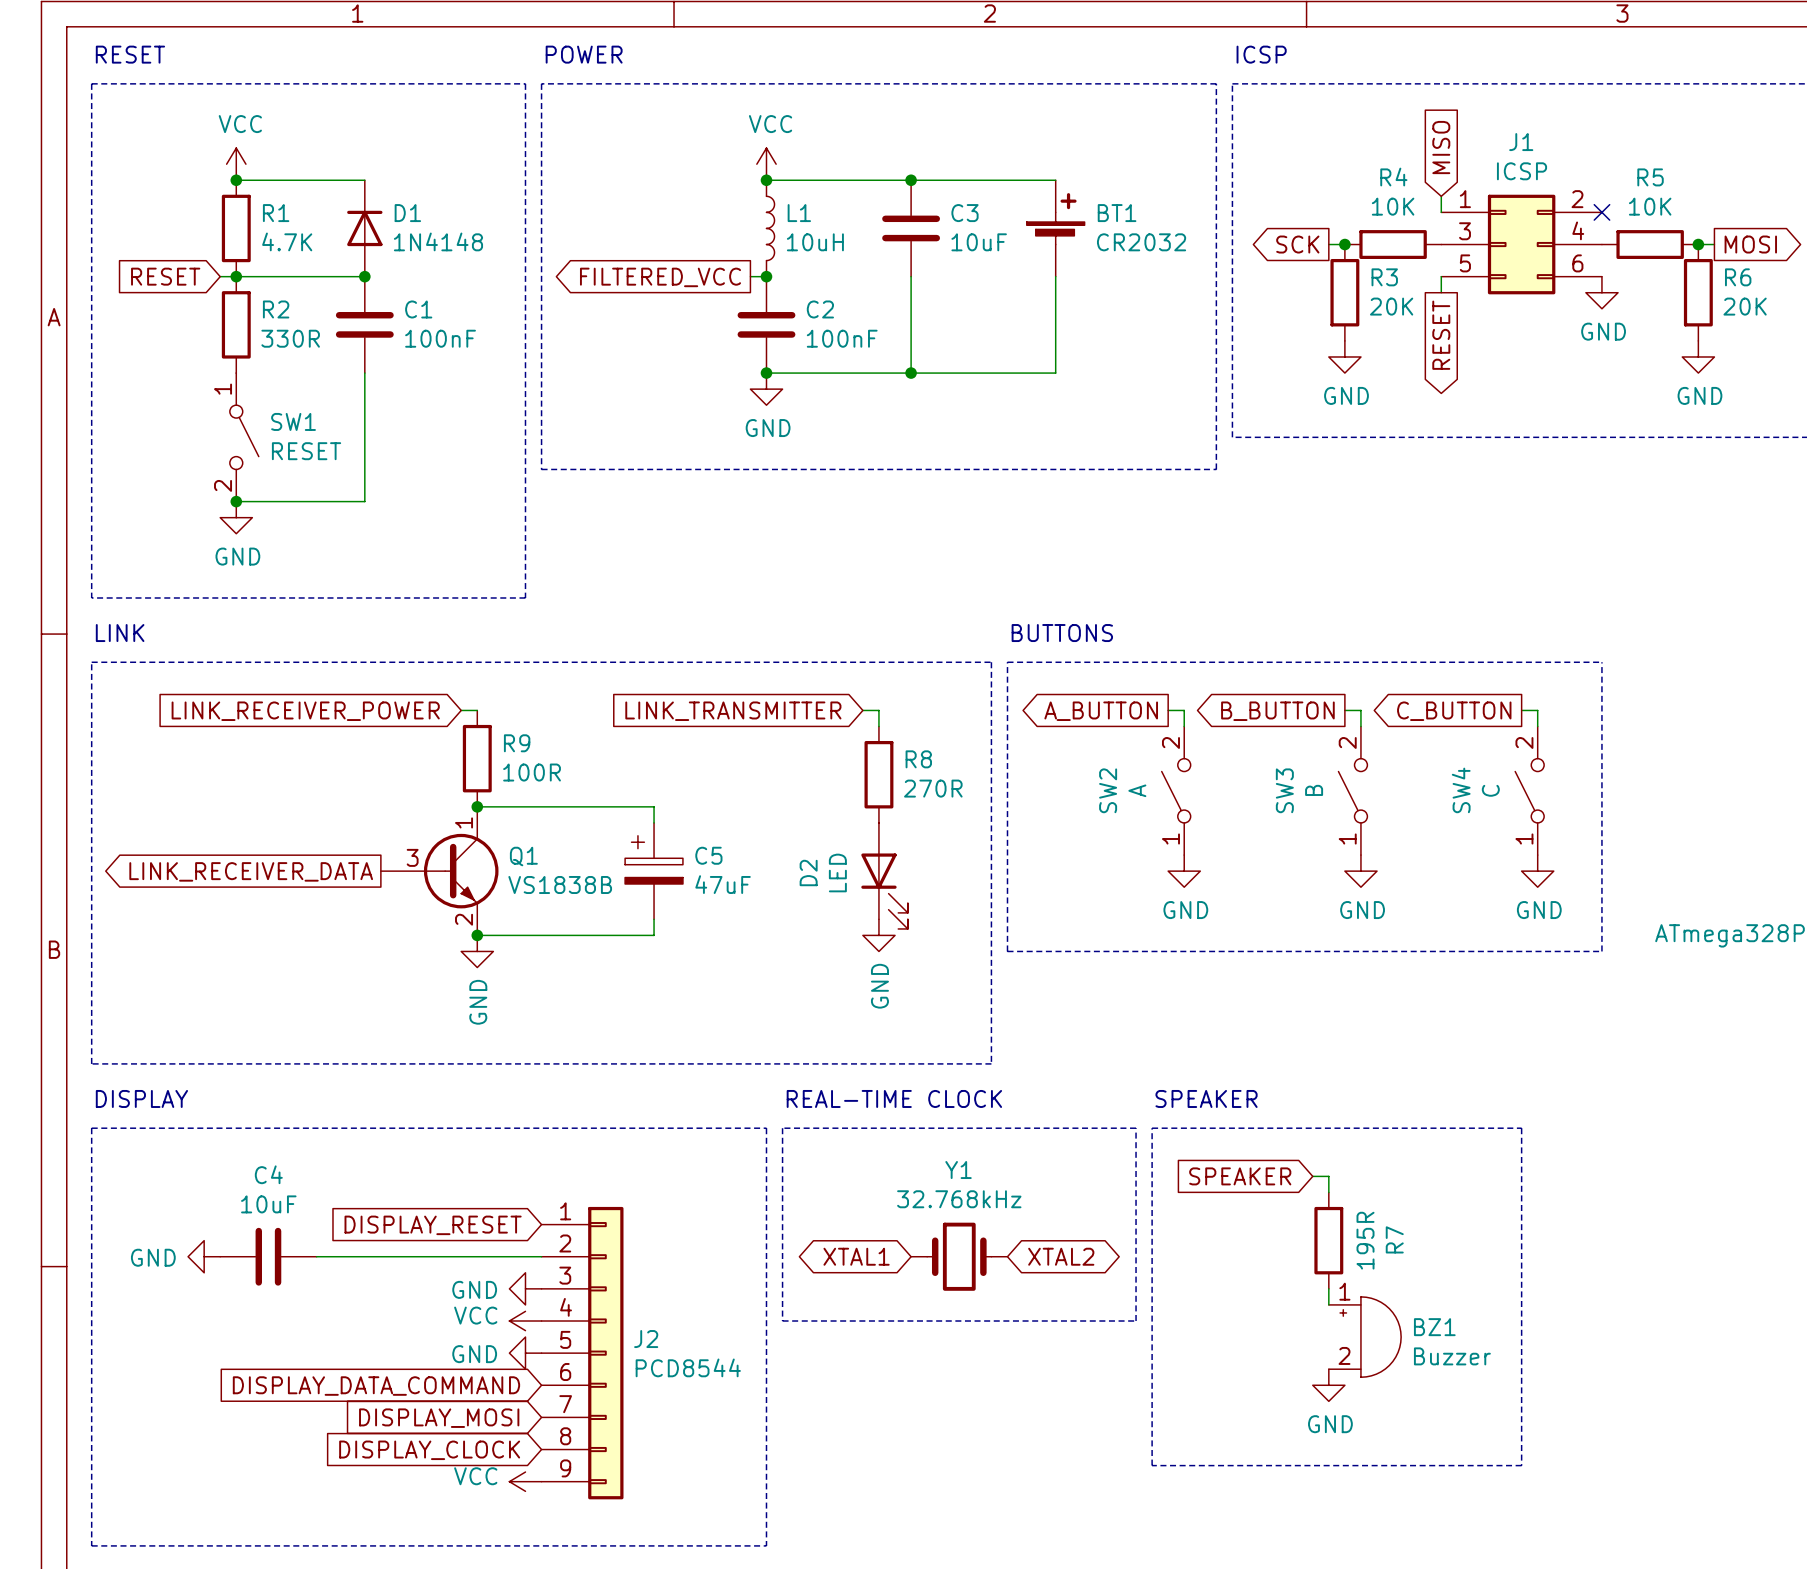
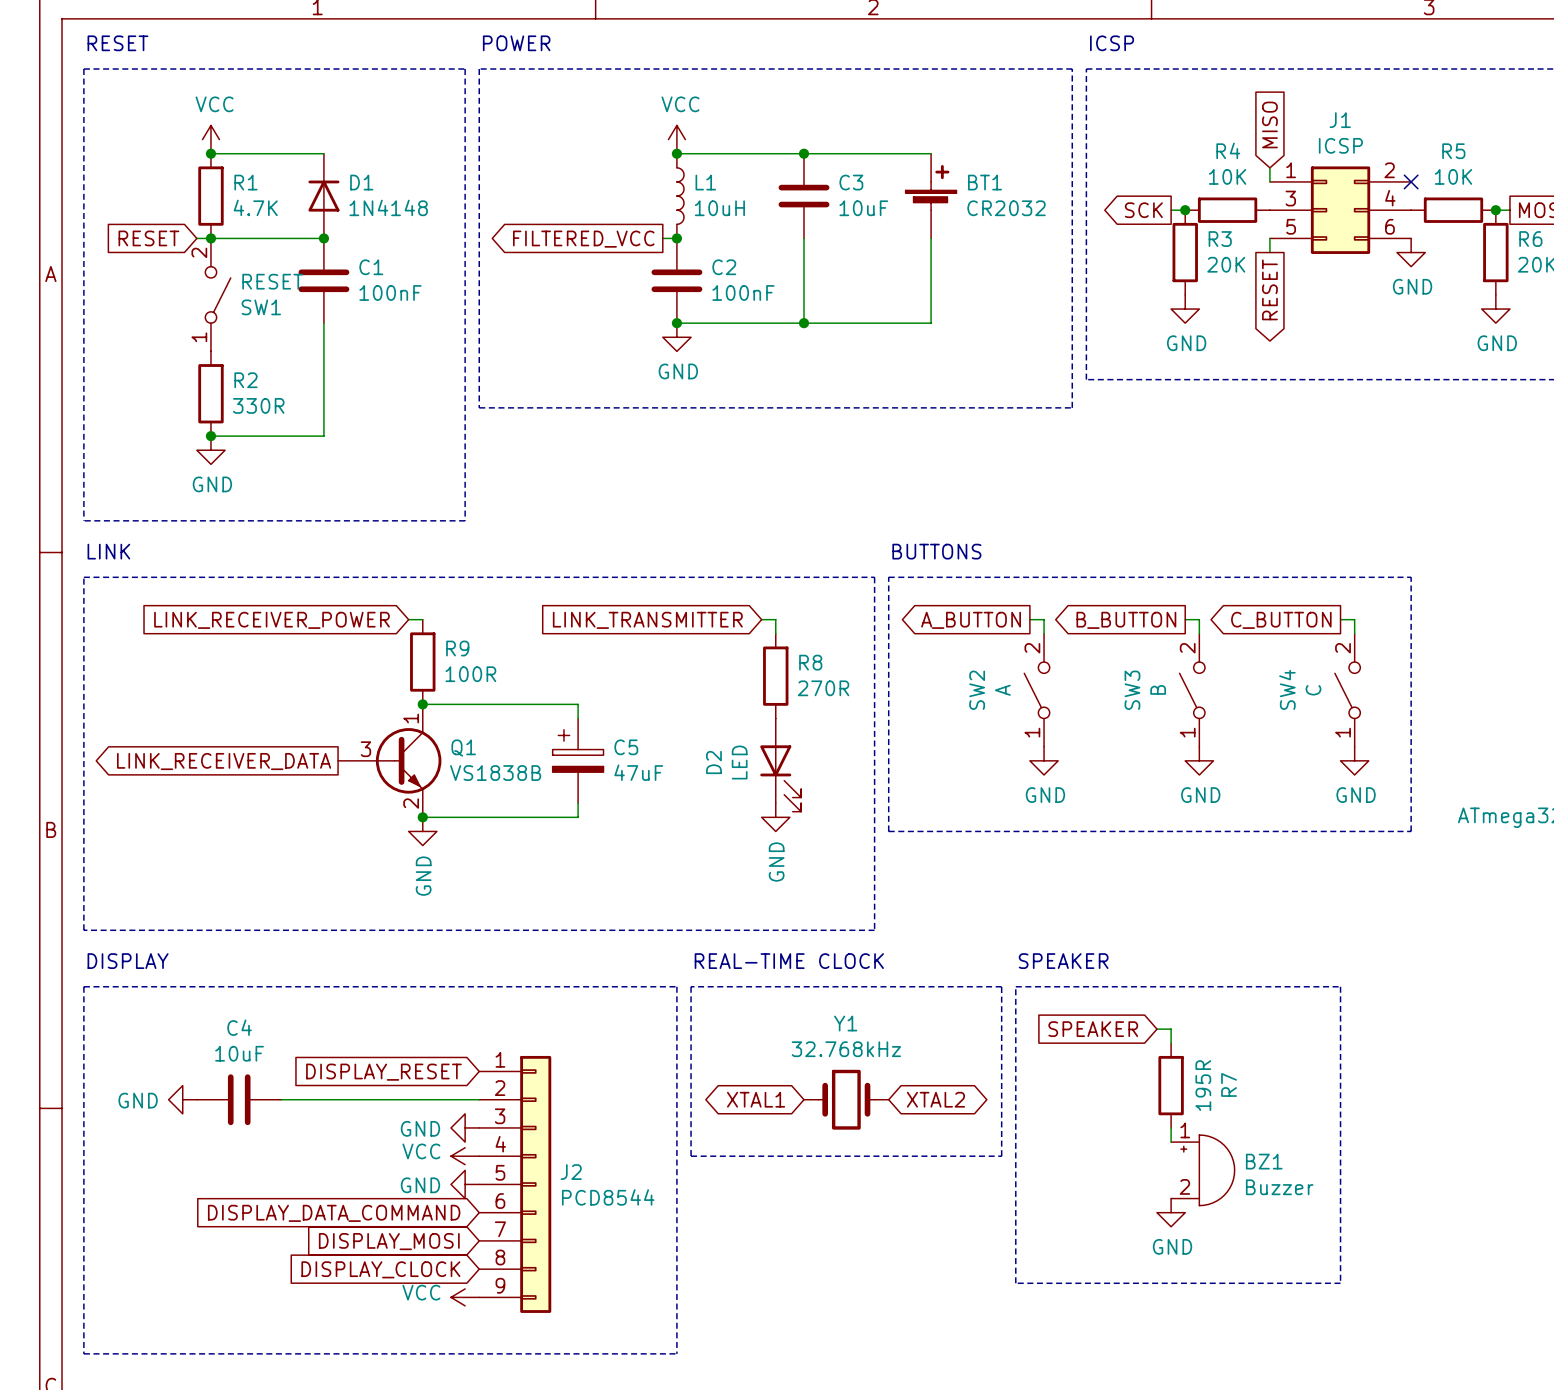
R2 position: (236, 324) -> (210, 393)
SW1 flip: as is (244, 437) -> up-down (218, 294)
SW1 position: (244, 437) -> (218, 294)

